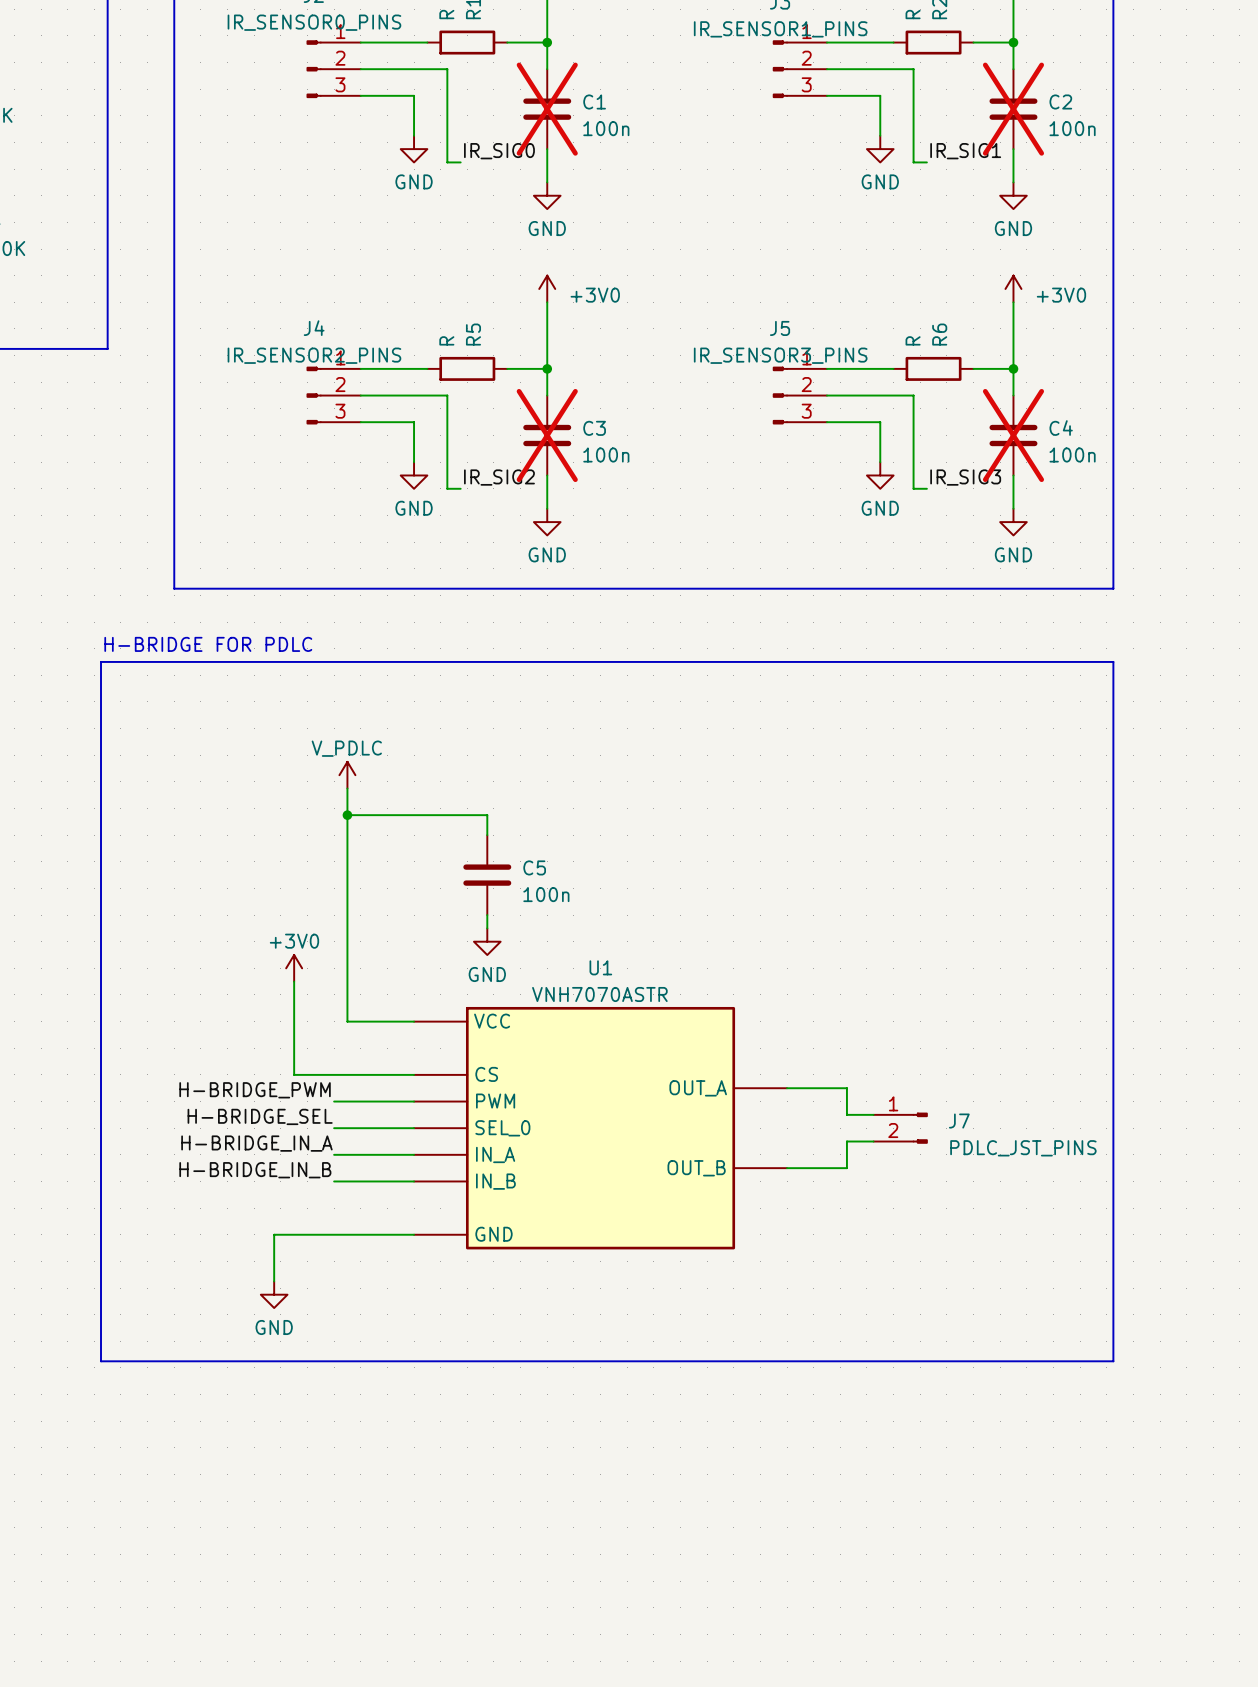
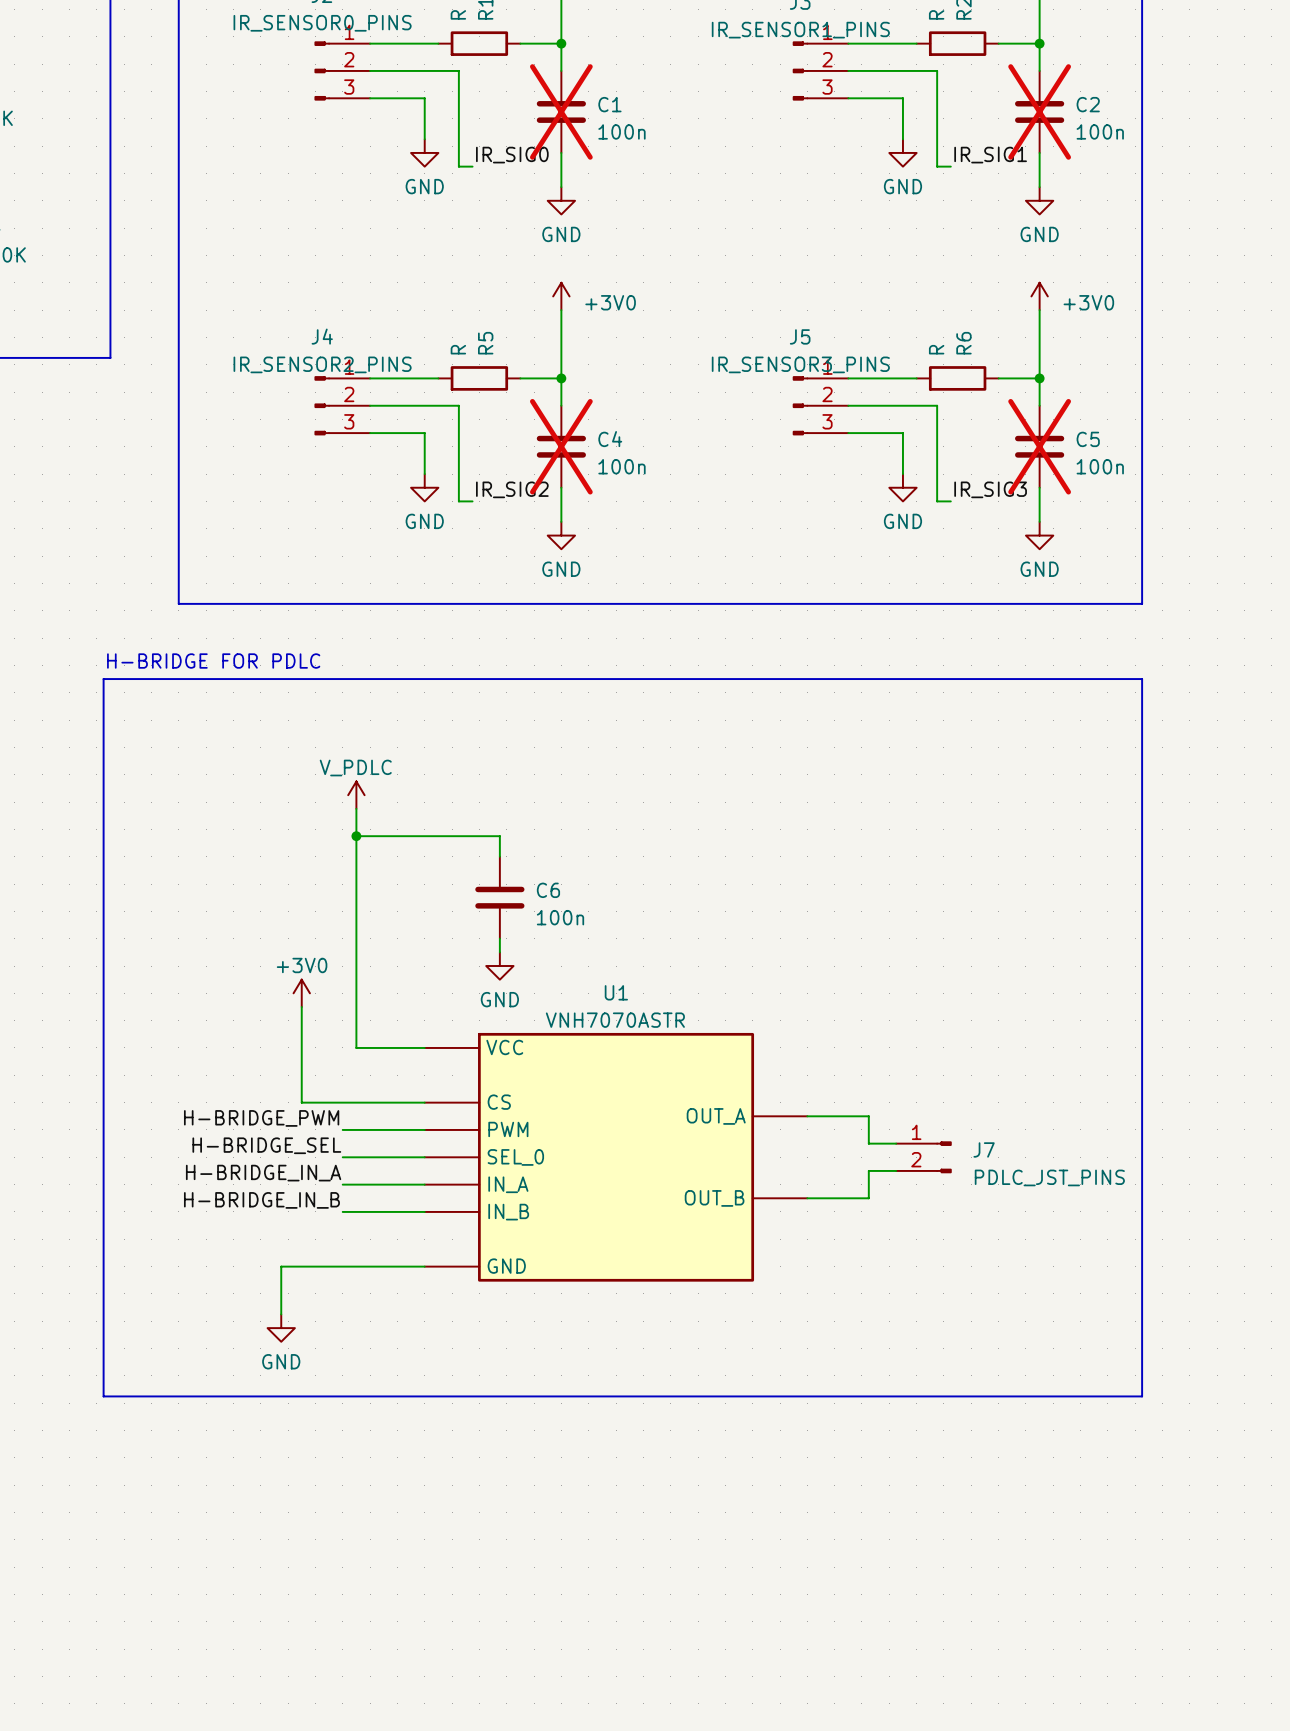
C3 name: C3 (594, 428) -> C4 (610, 439)
C4 name: C4 (1061, 428) -> C5 (1088, 439)
C5 name: C5 (534, 867) -> C6 (548, 890)

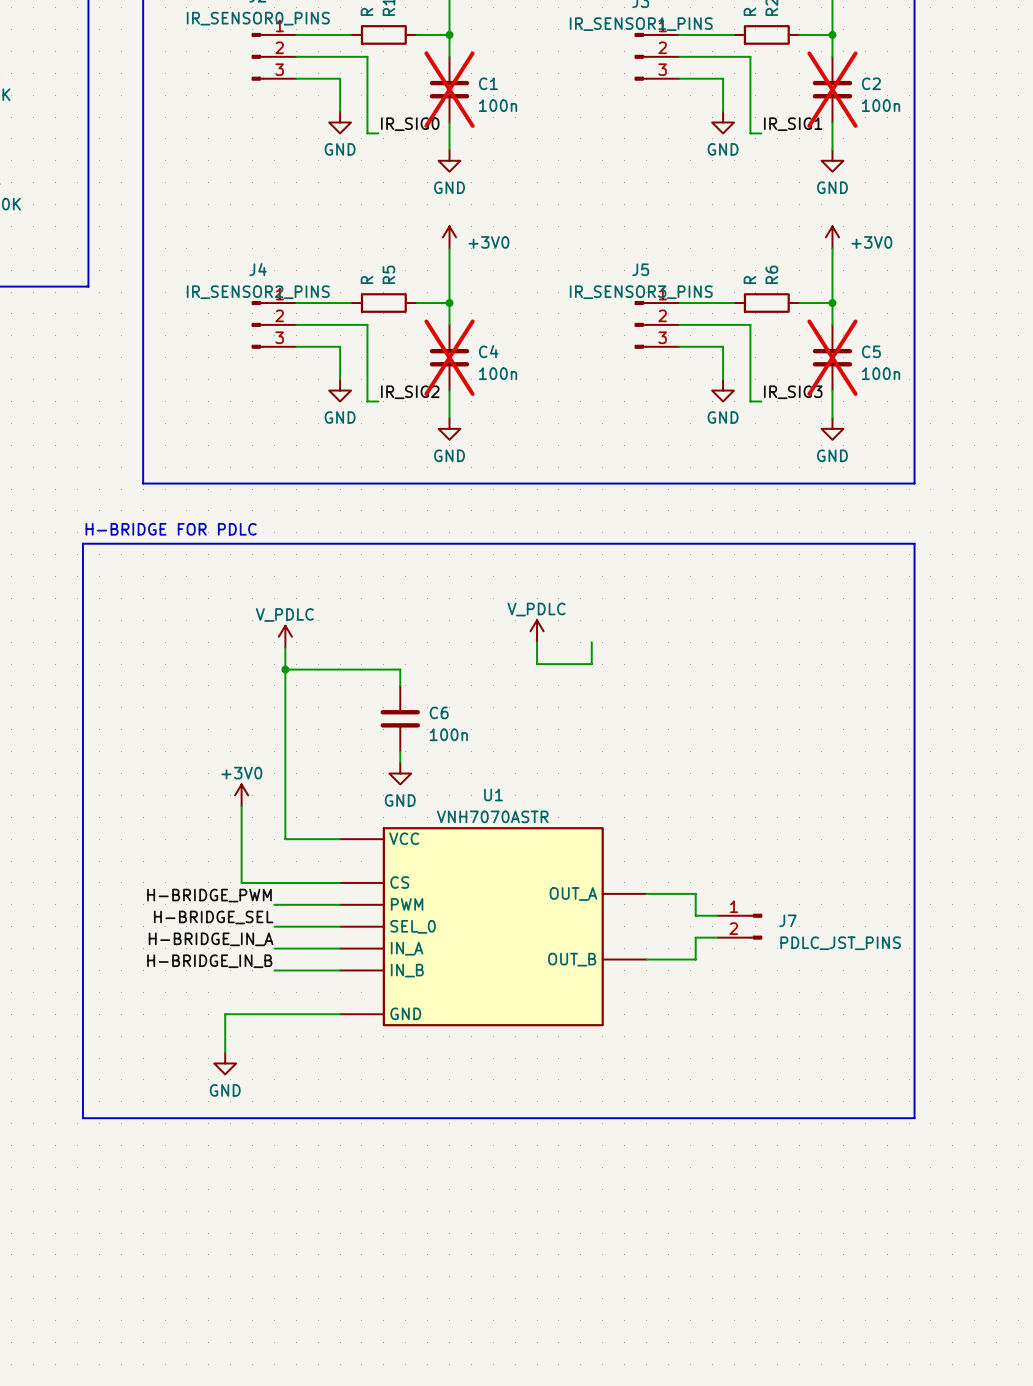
power symbol: none -> V_PDLC (537, 631)
wire: none -> (537, 642) (537, 664) (591, 664) (591, 642)

